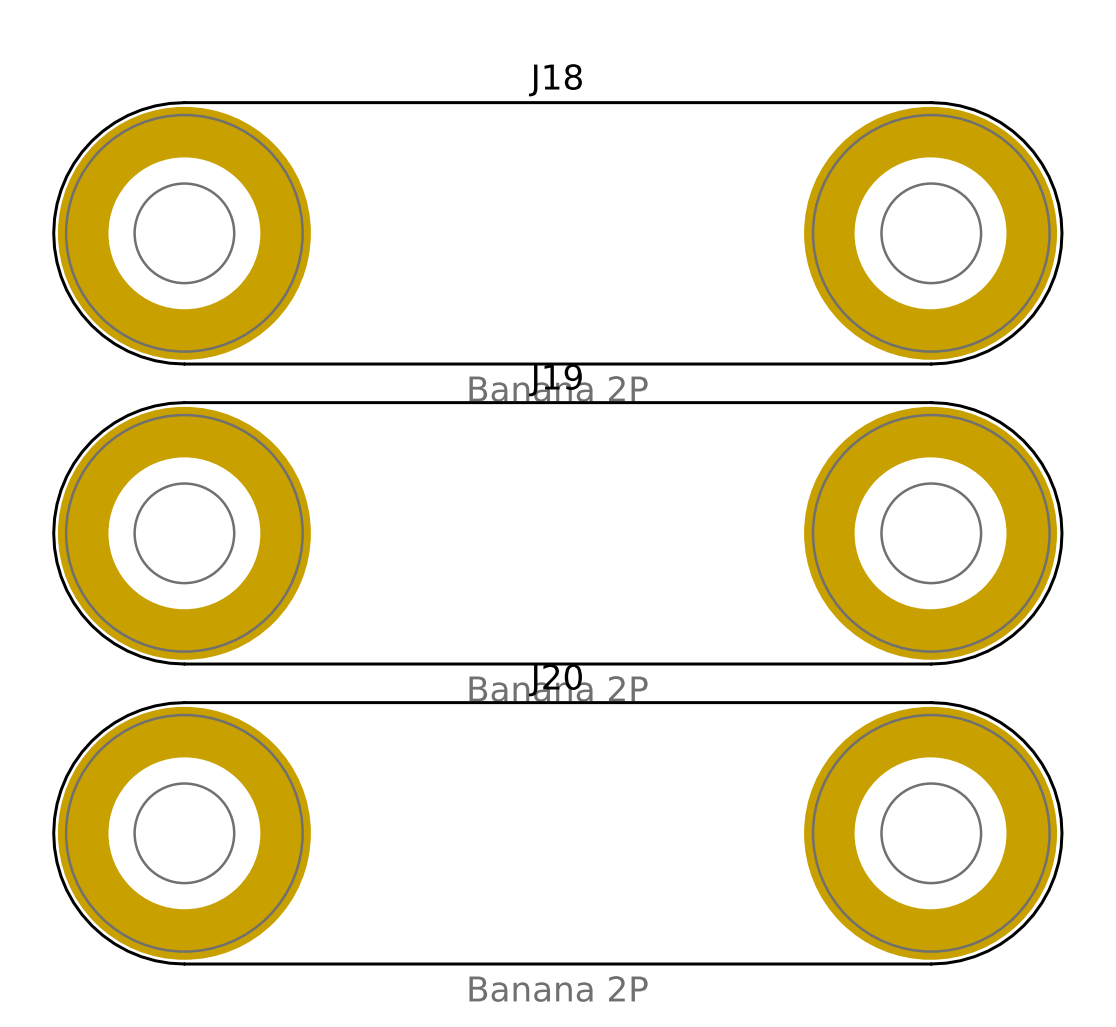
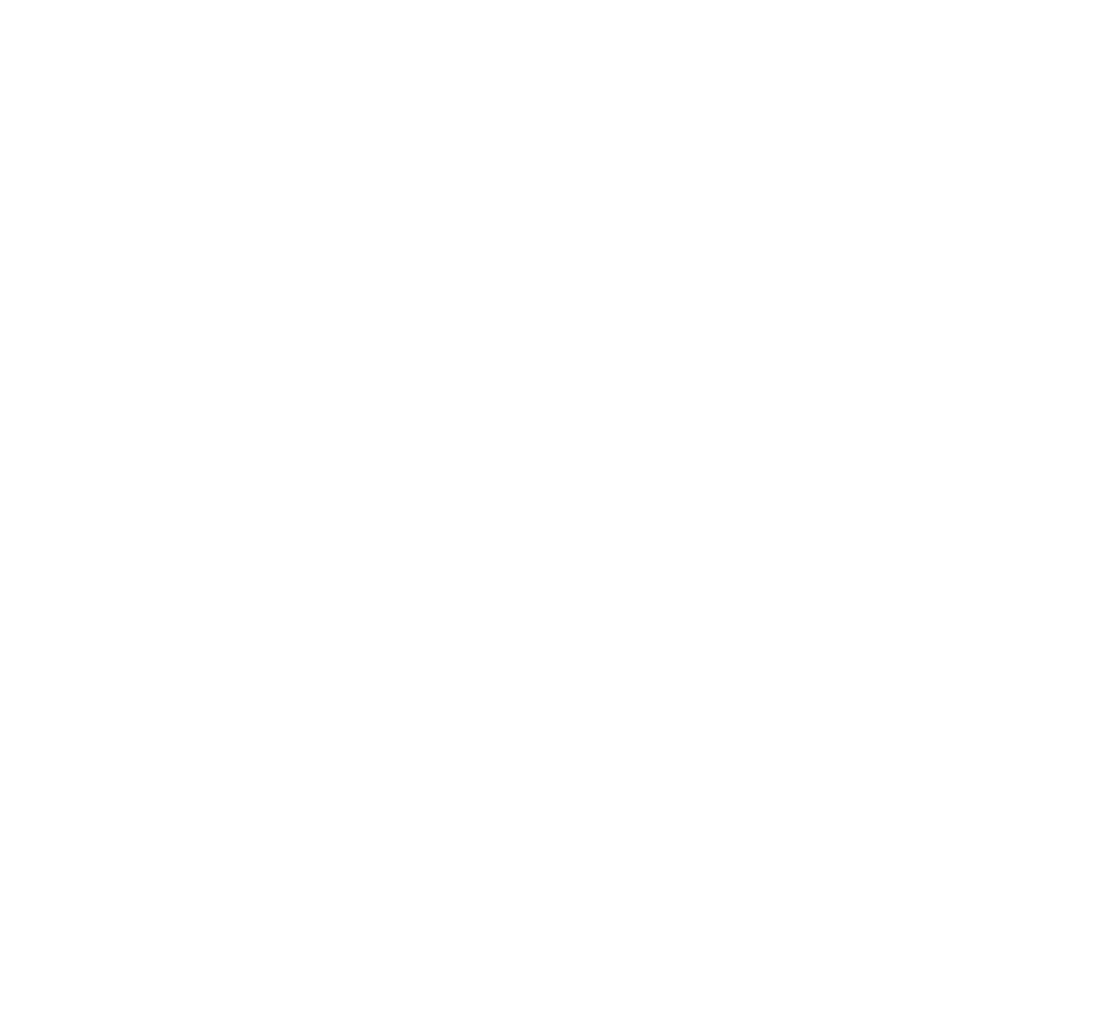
J18: Banana 2P (557, 233) -> none
J19: Banana 2P (557, 533) -> none
J20: Banana 2P (557, 833) -> none

